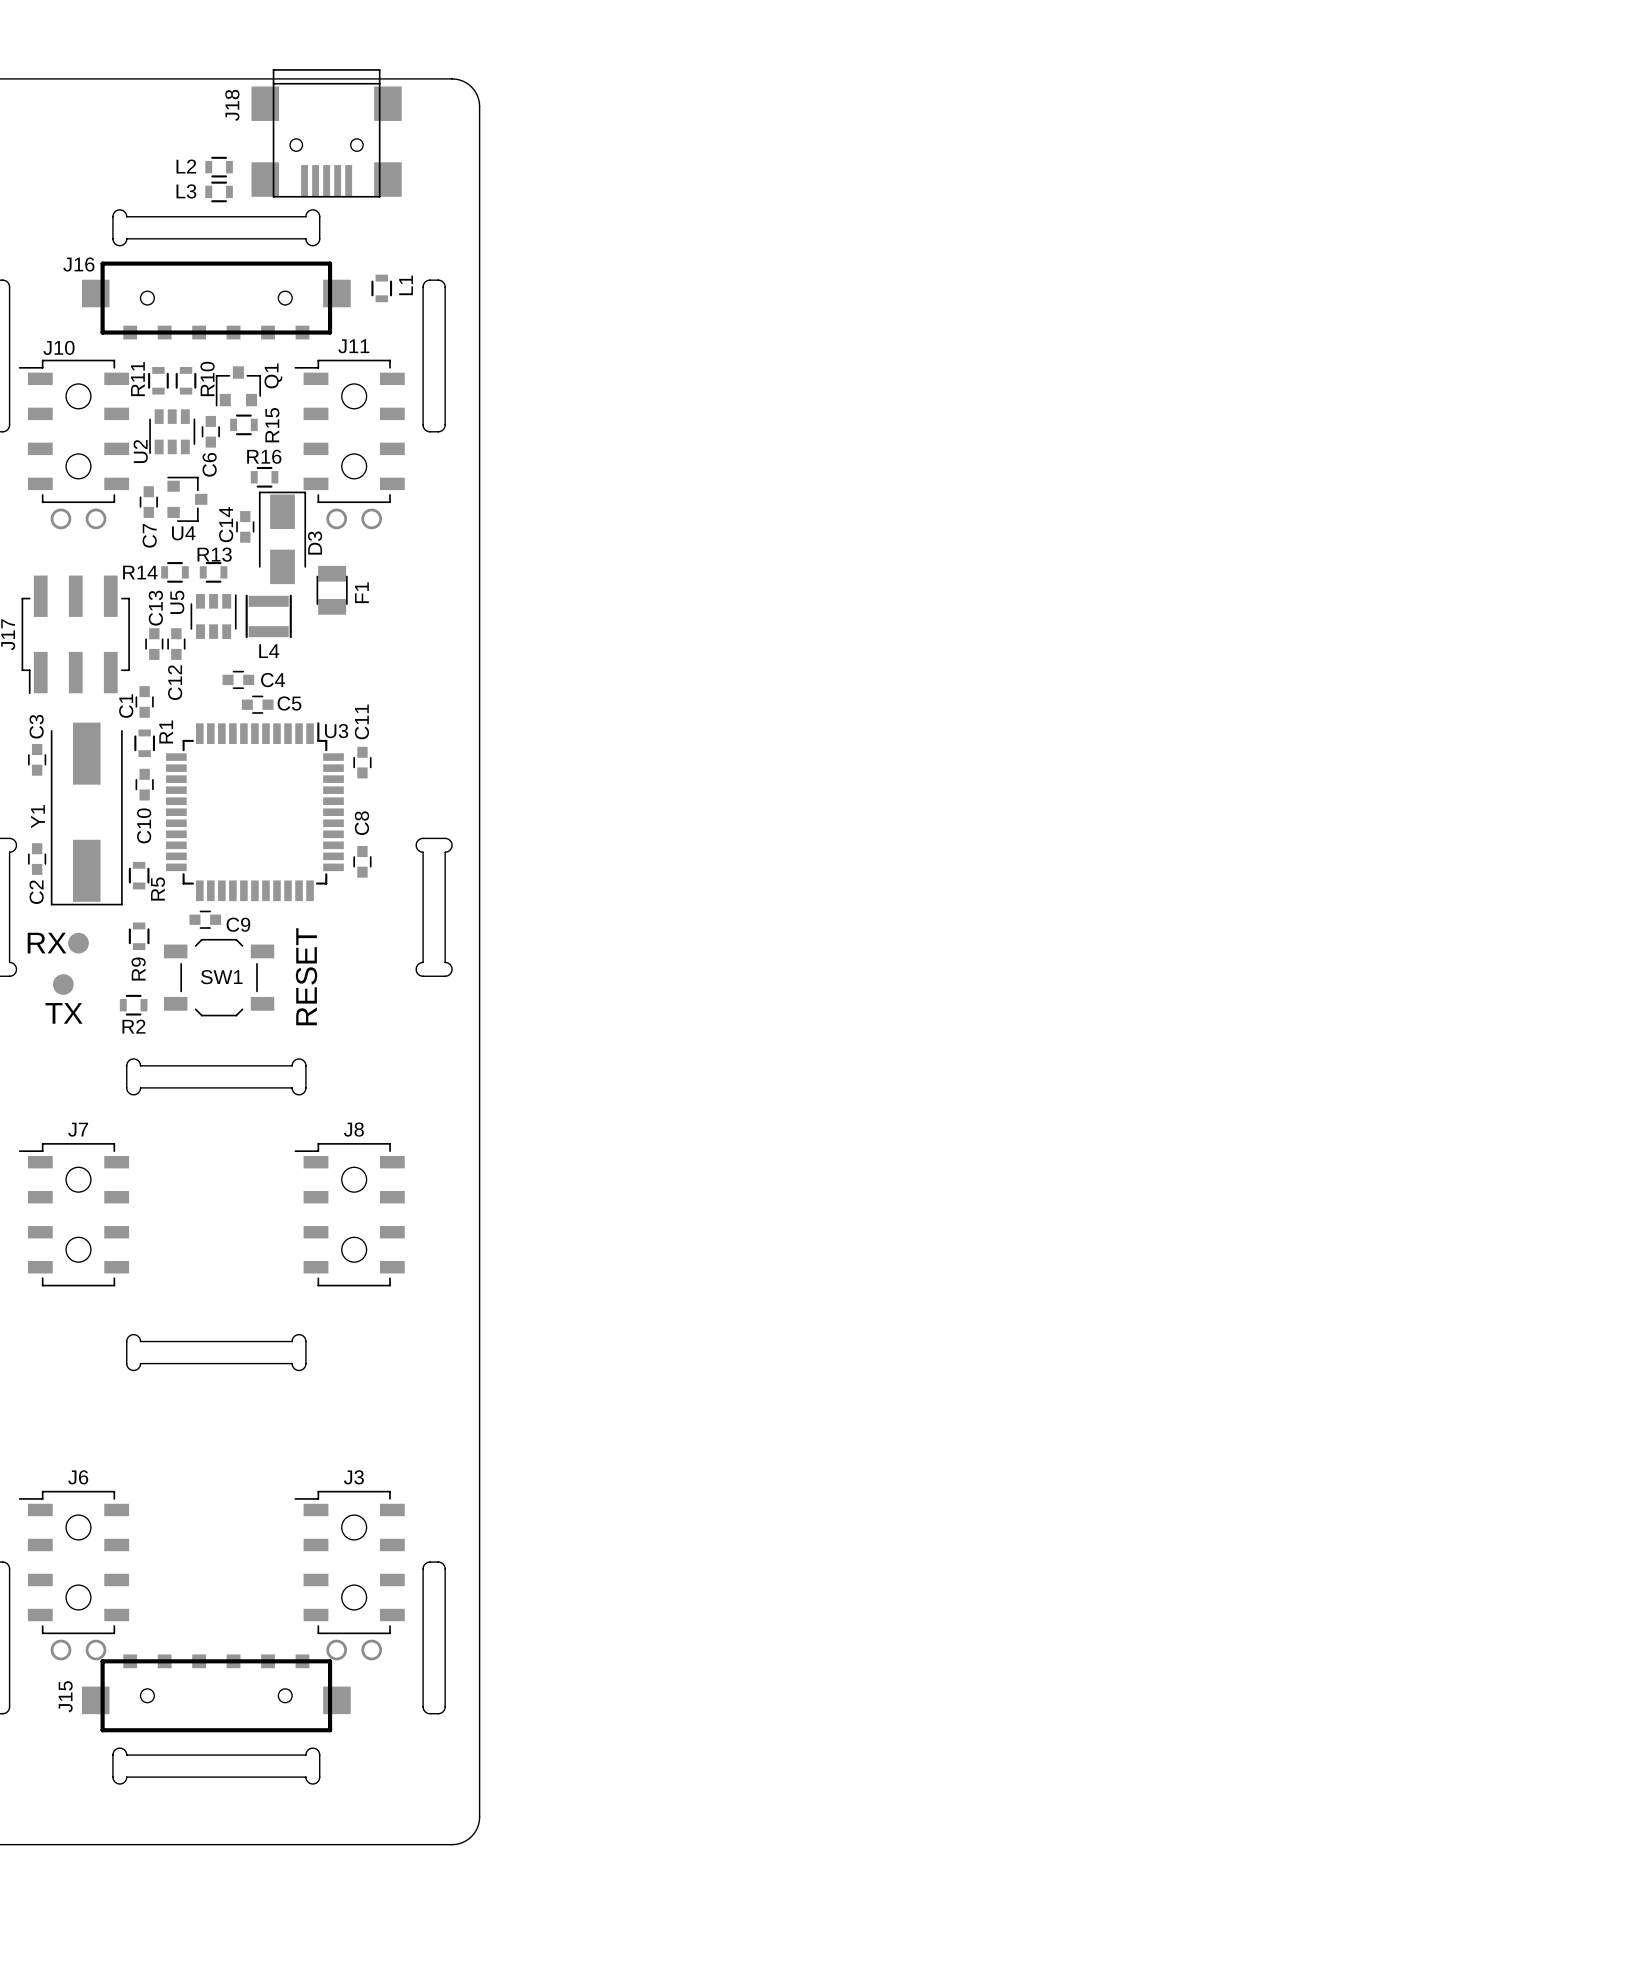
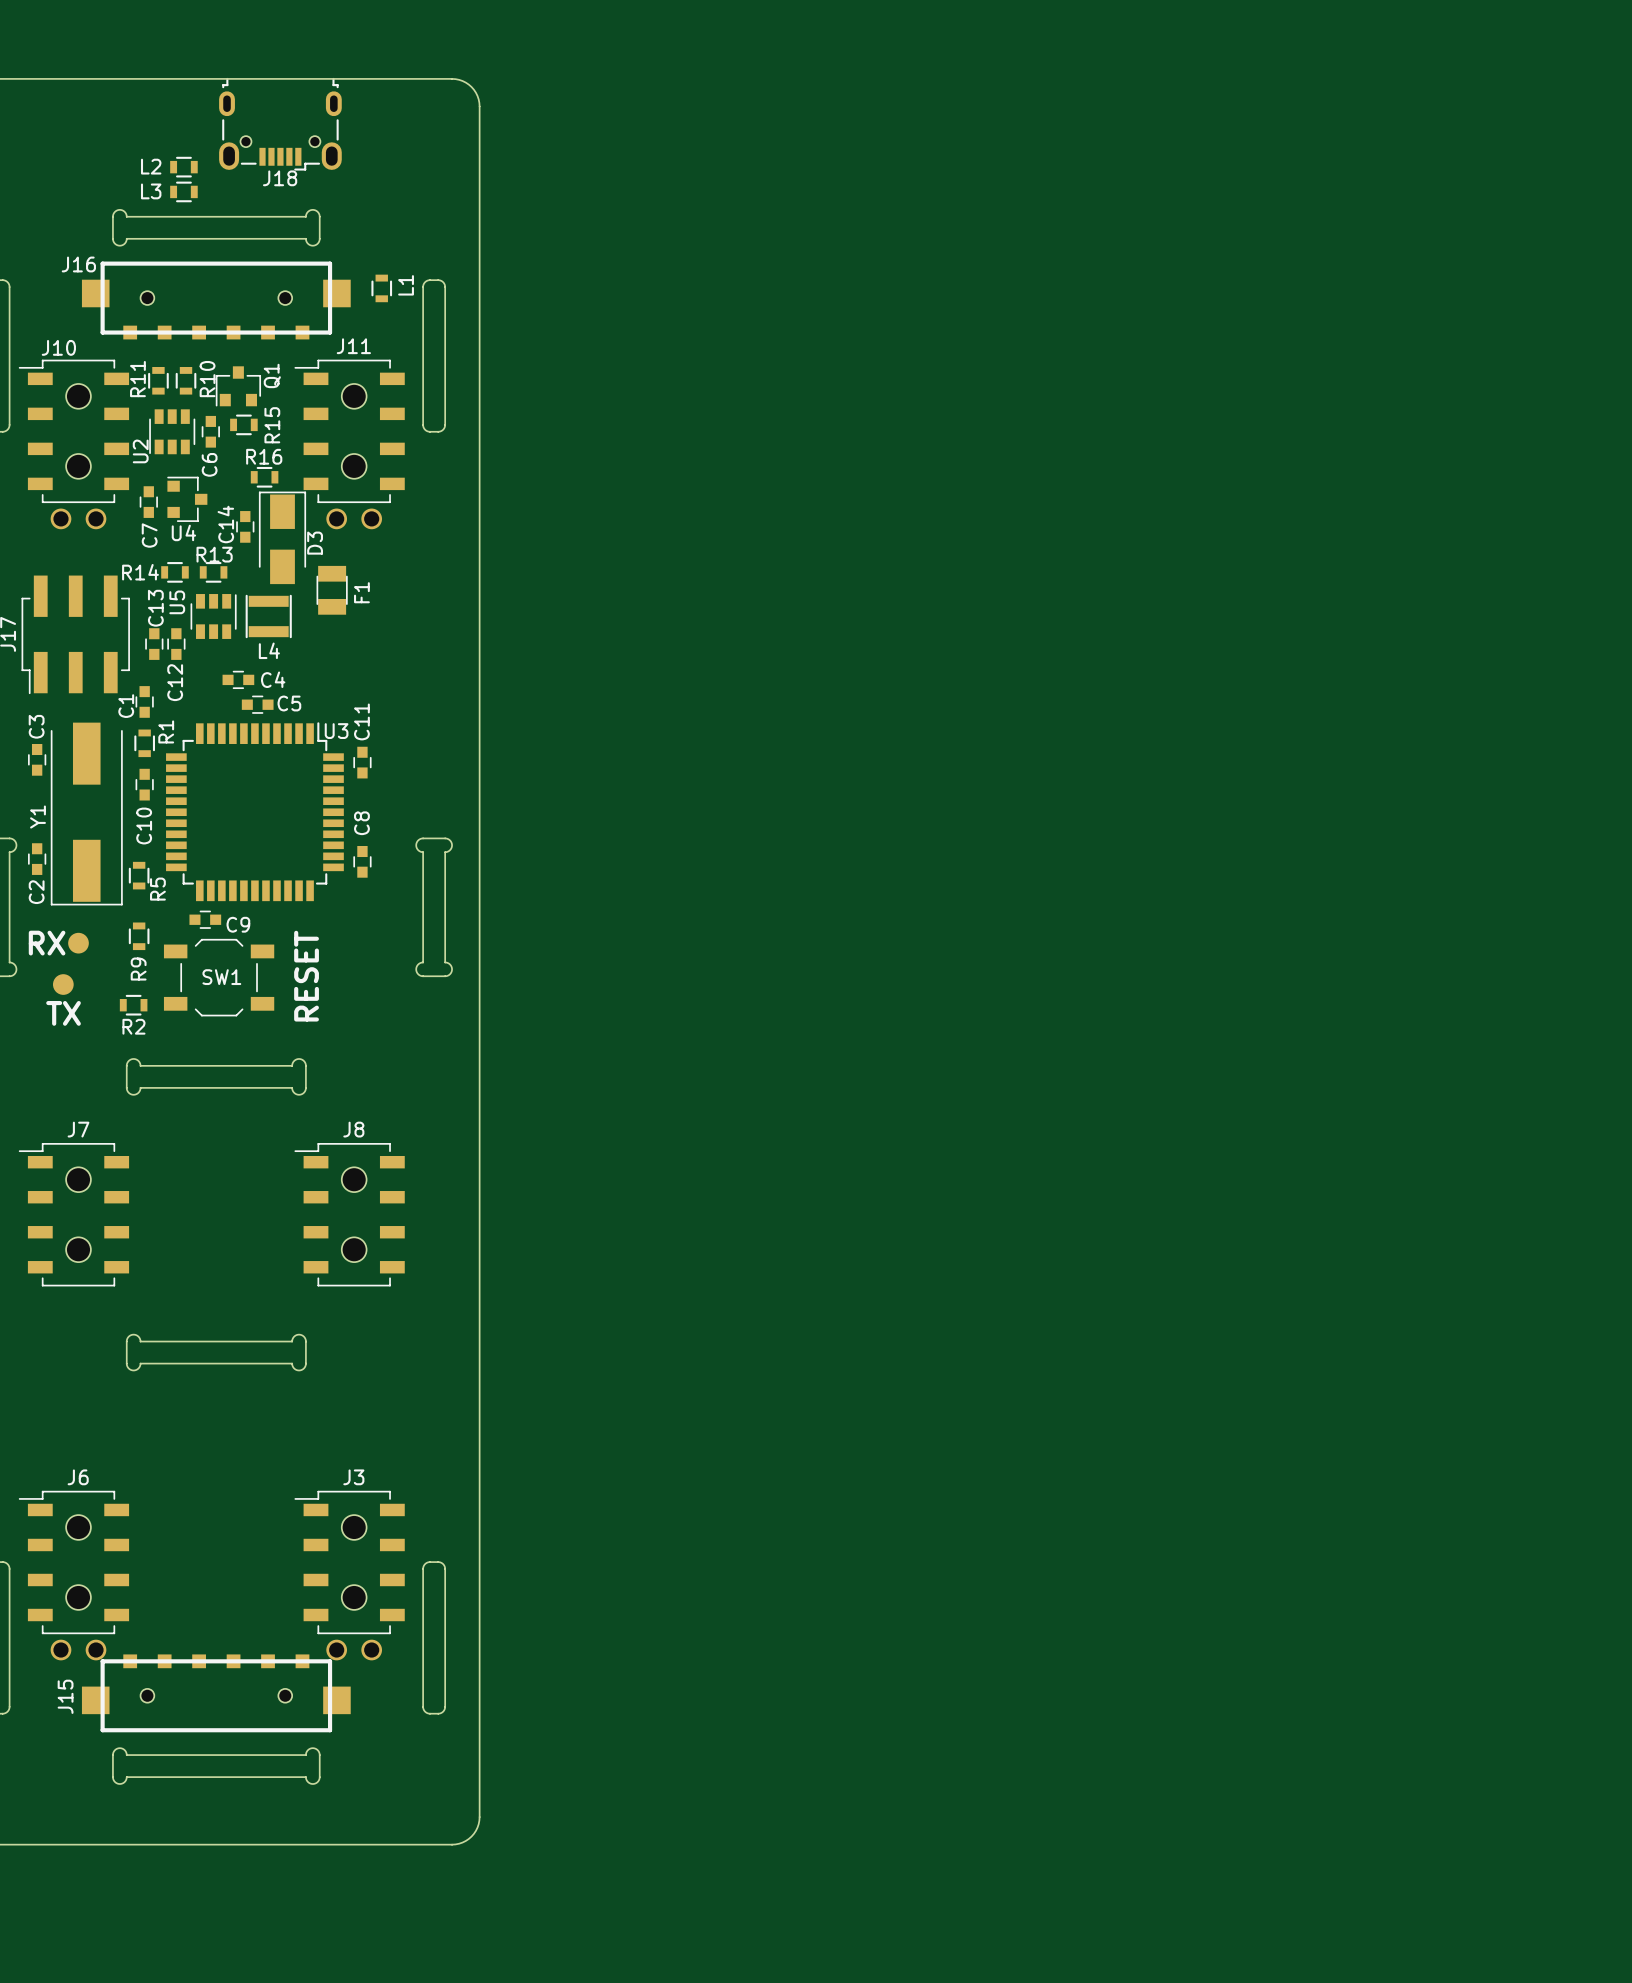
J18 footprint: [251, 69, 402, 198] -> [219, 77, 342, 171]
J18 name position: J18 (232, 105) -> J18 (280, 178)
L2 position: (219, 167) -> (183, 167)
L3 position: (219, 191) -> (183, 191)

